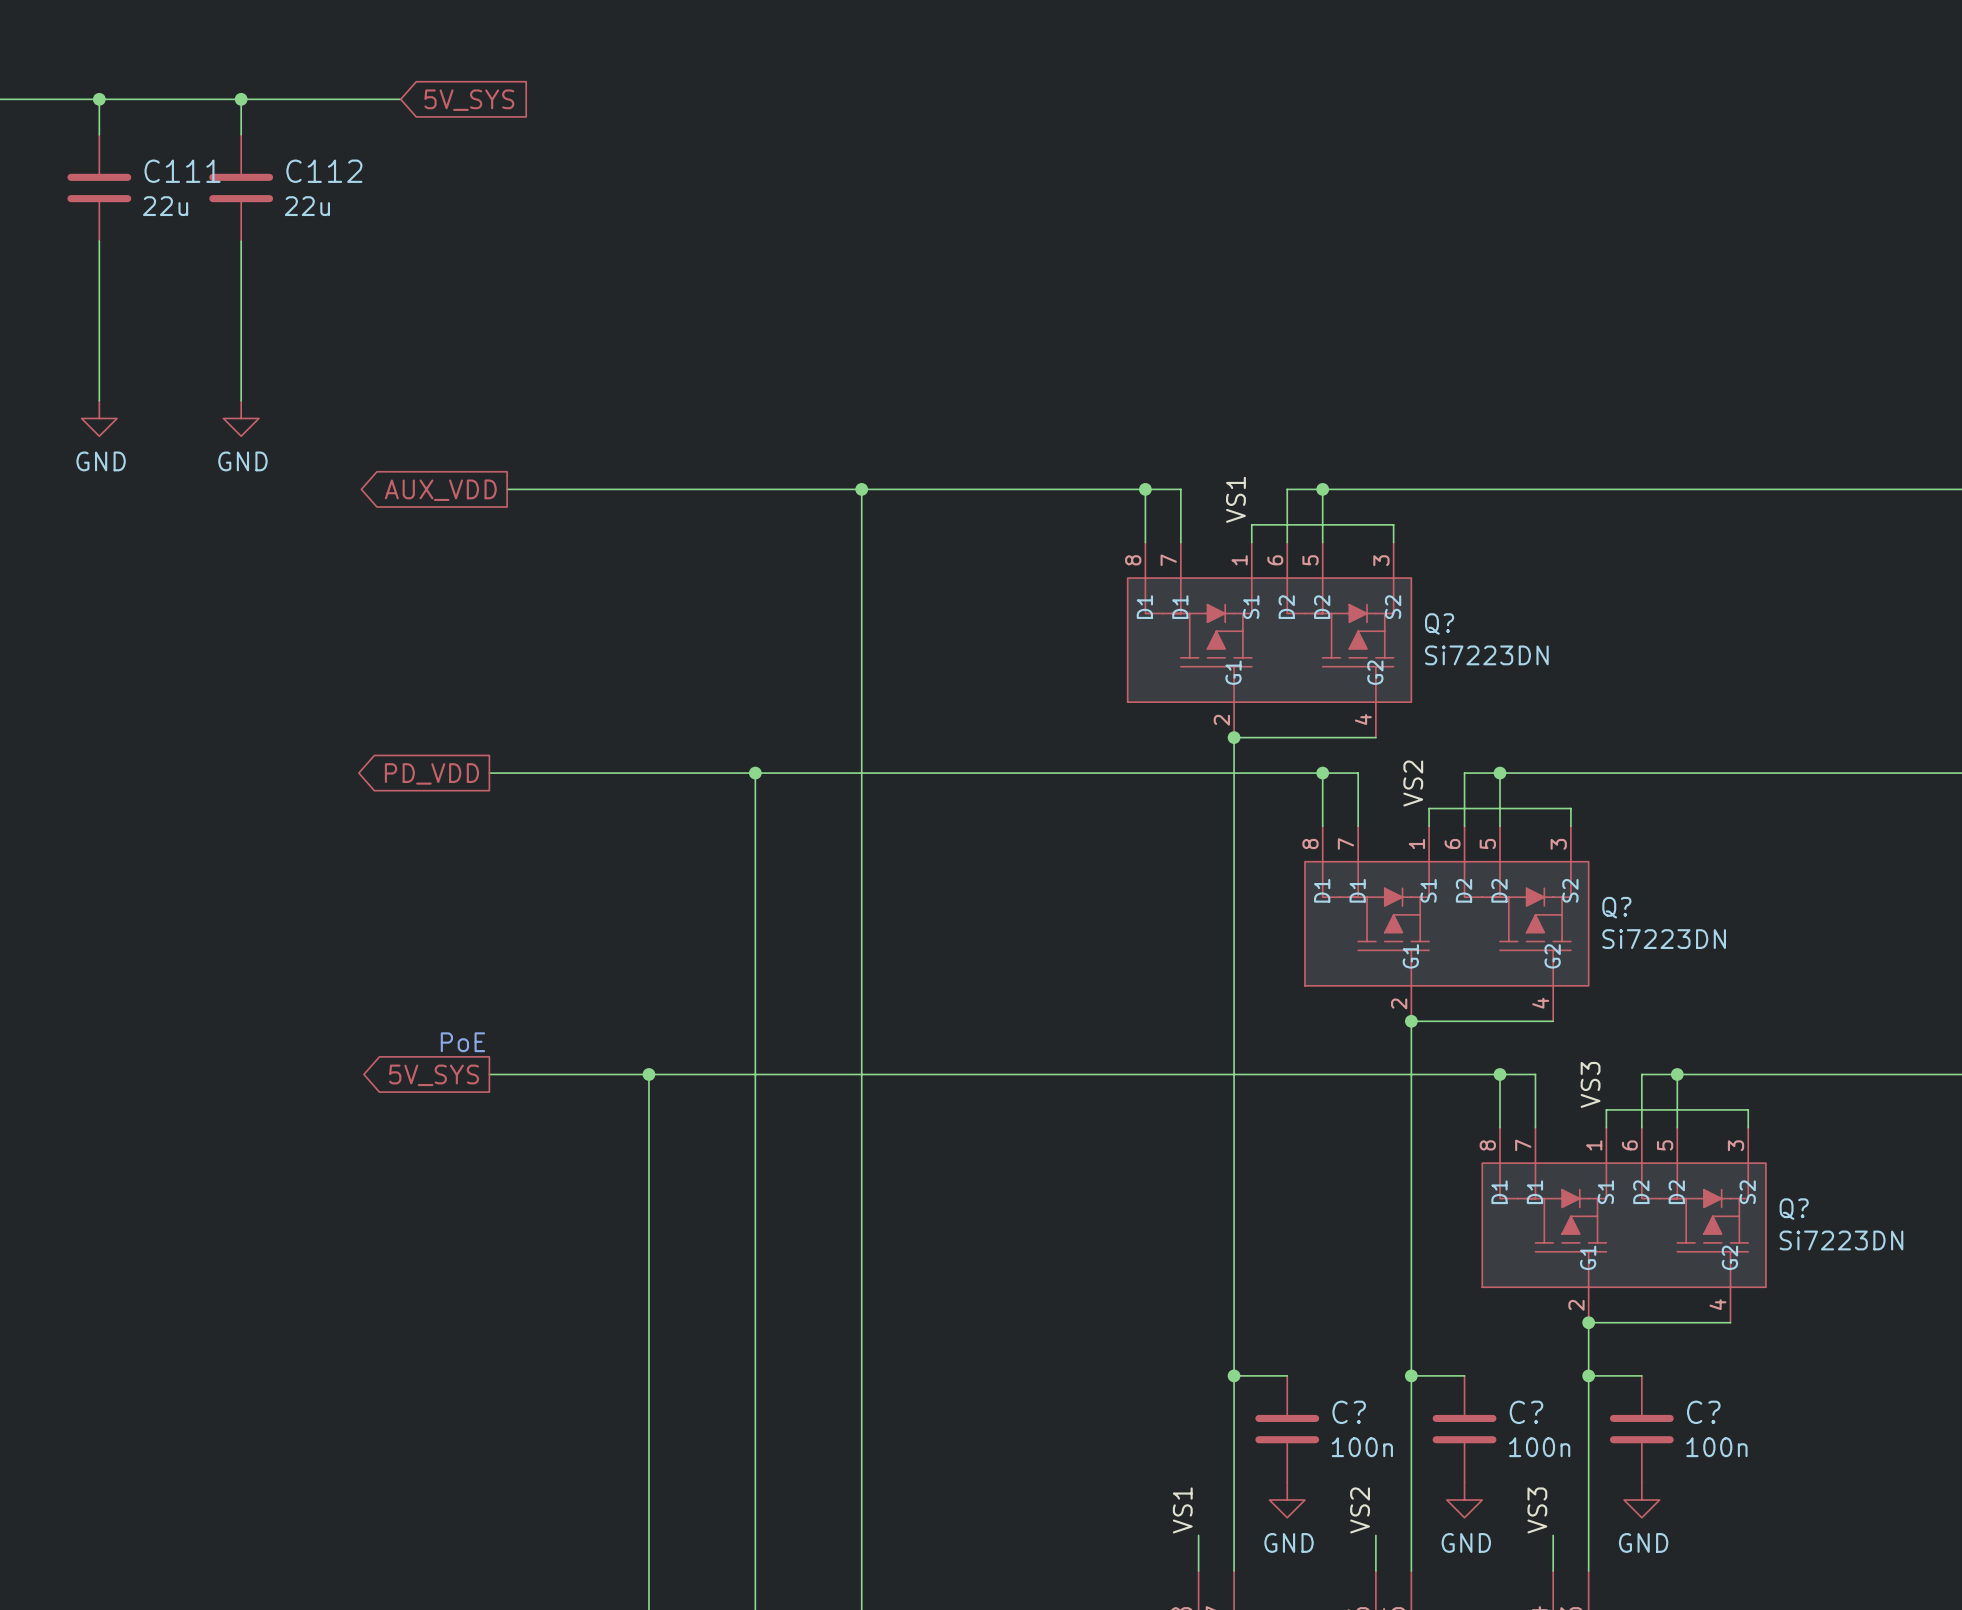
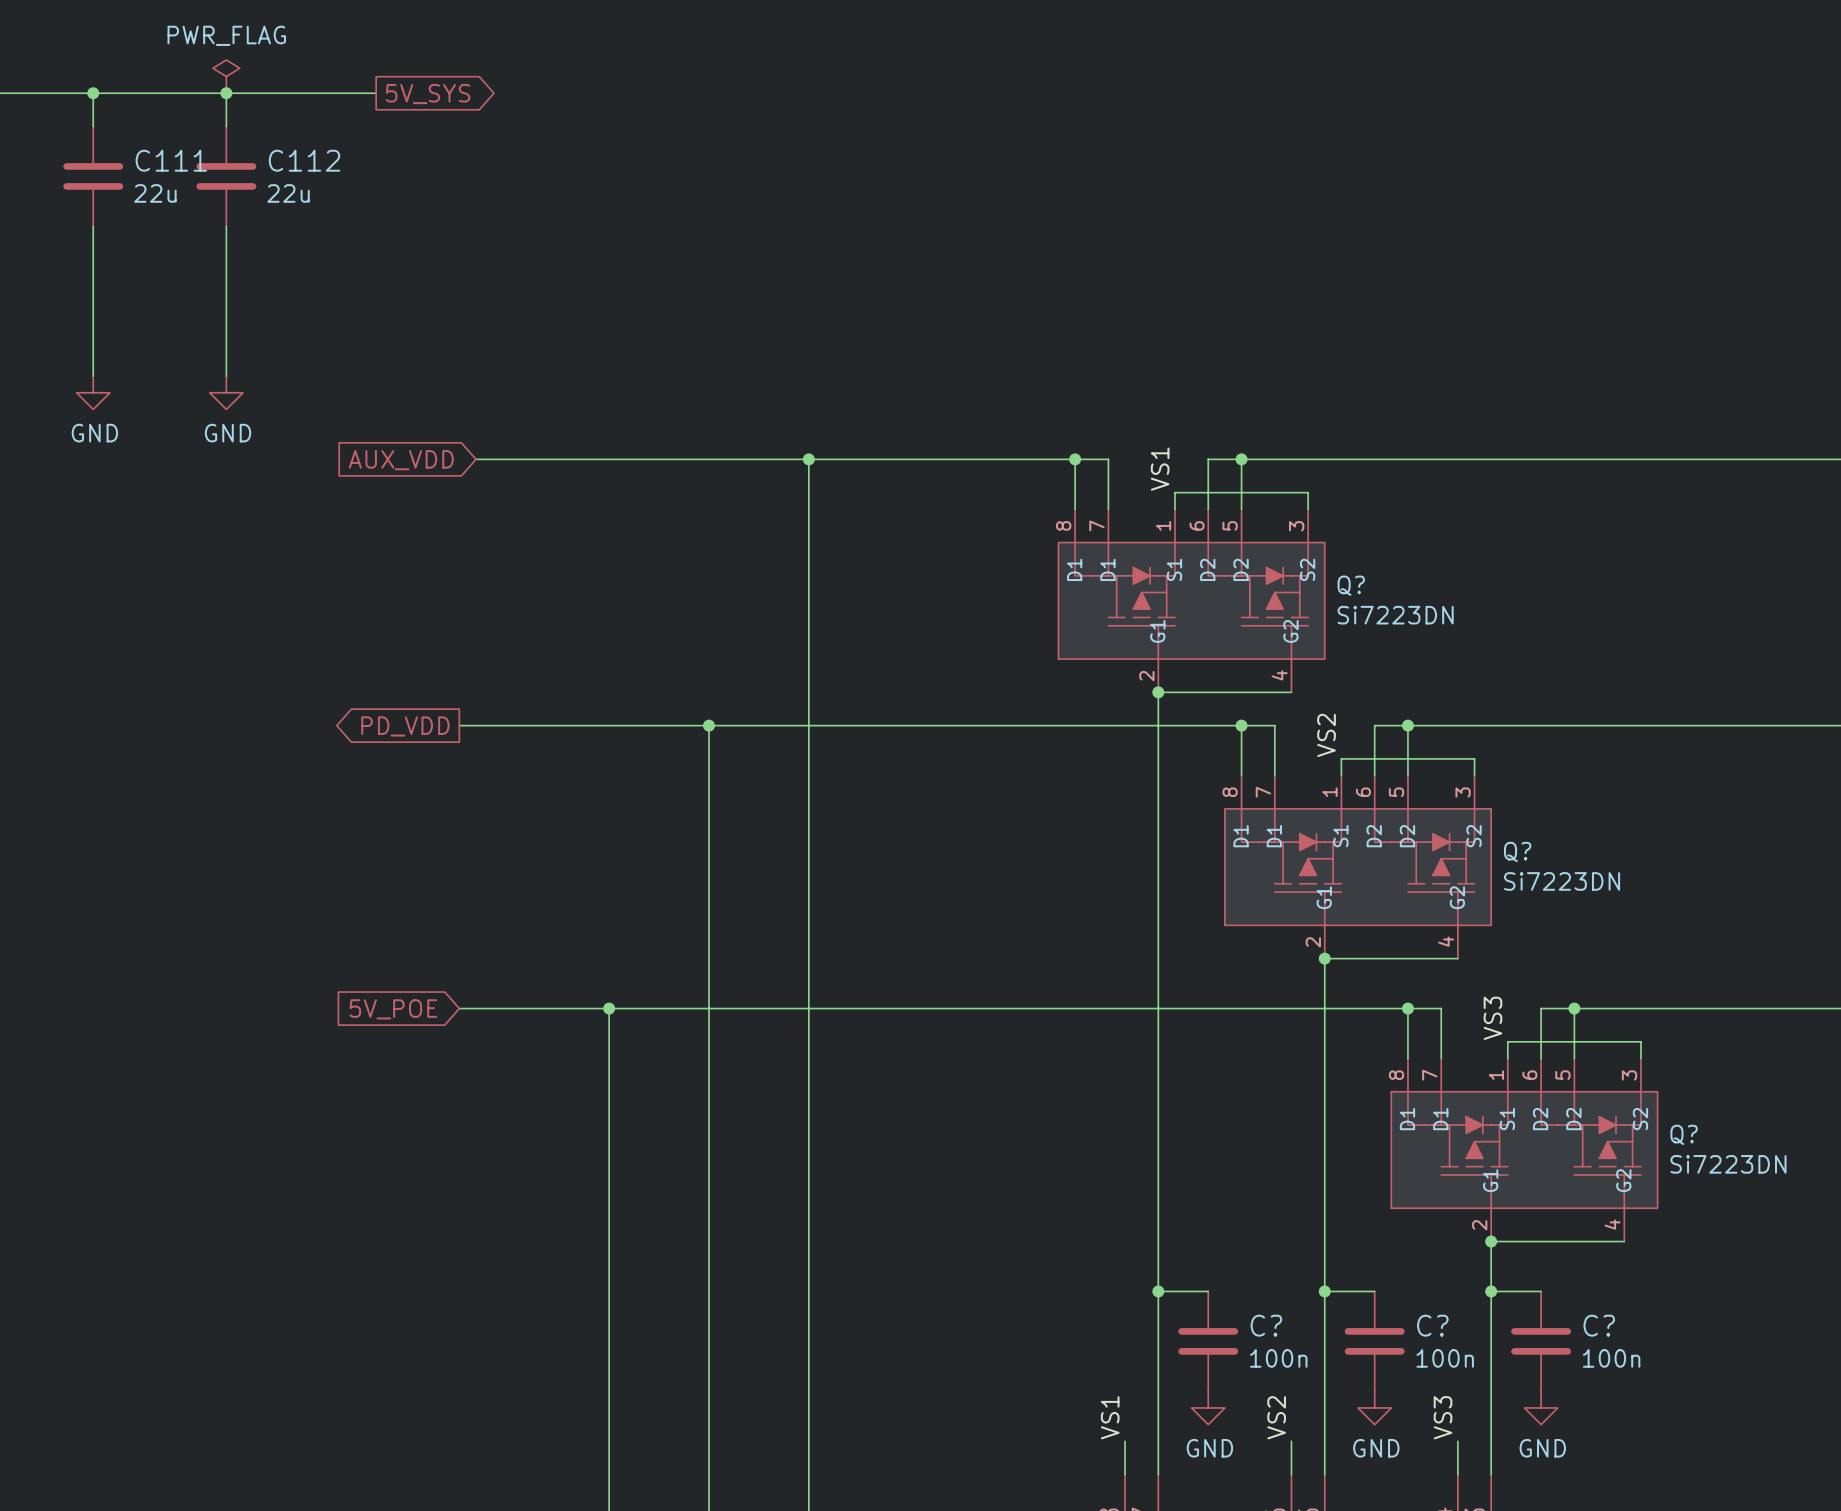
power symbol: none -> PWR_FLAG (226, 76)
global label shape: input (469, 100) -> output (428, 94)
global label shape: output (440, 490) -> input (401, 460)
text: PoE (462, 1042) -> none
global label shape: output (434, 1075) -> input (393, 1009)
global label: 5V_SYS (434, 1075) -> 5V_POE (393, 1009)

